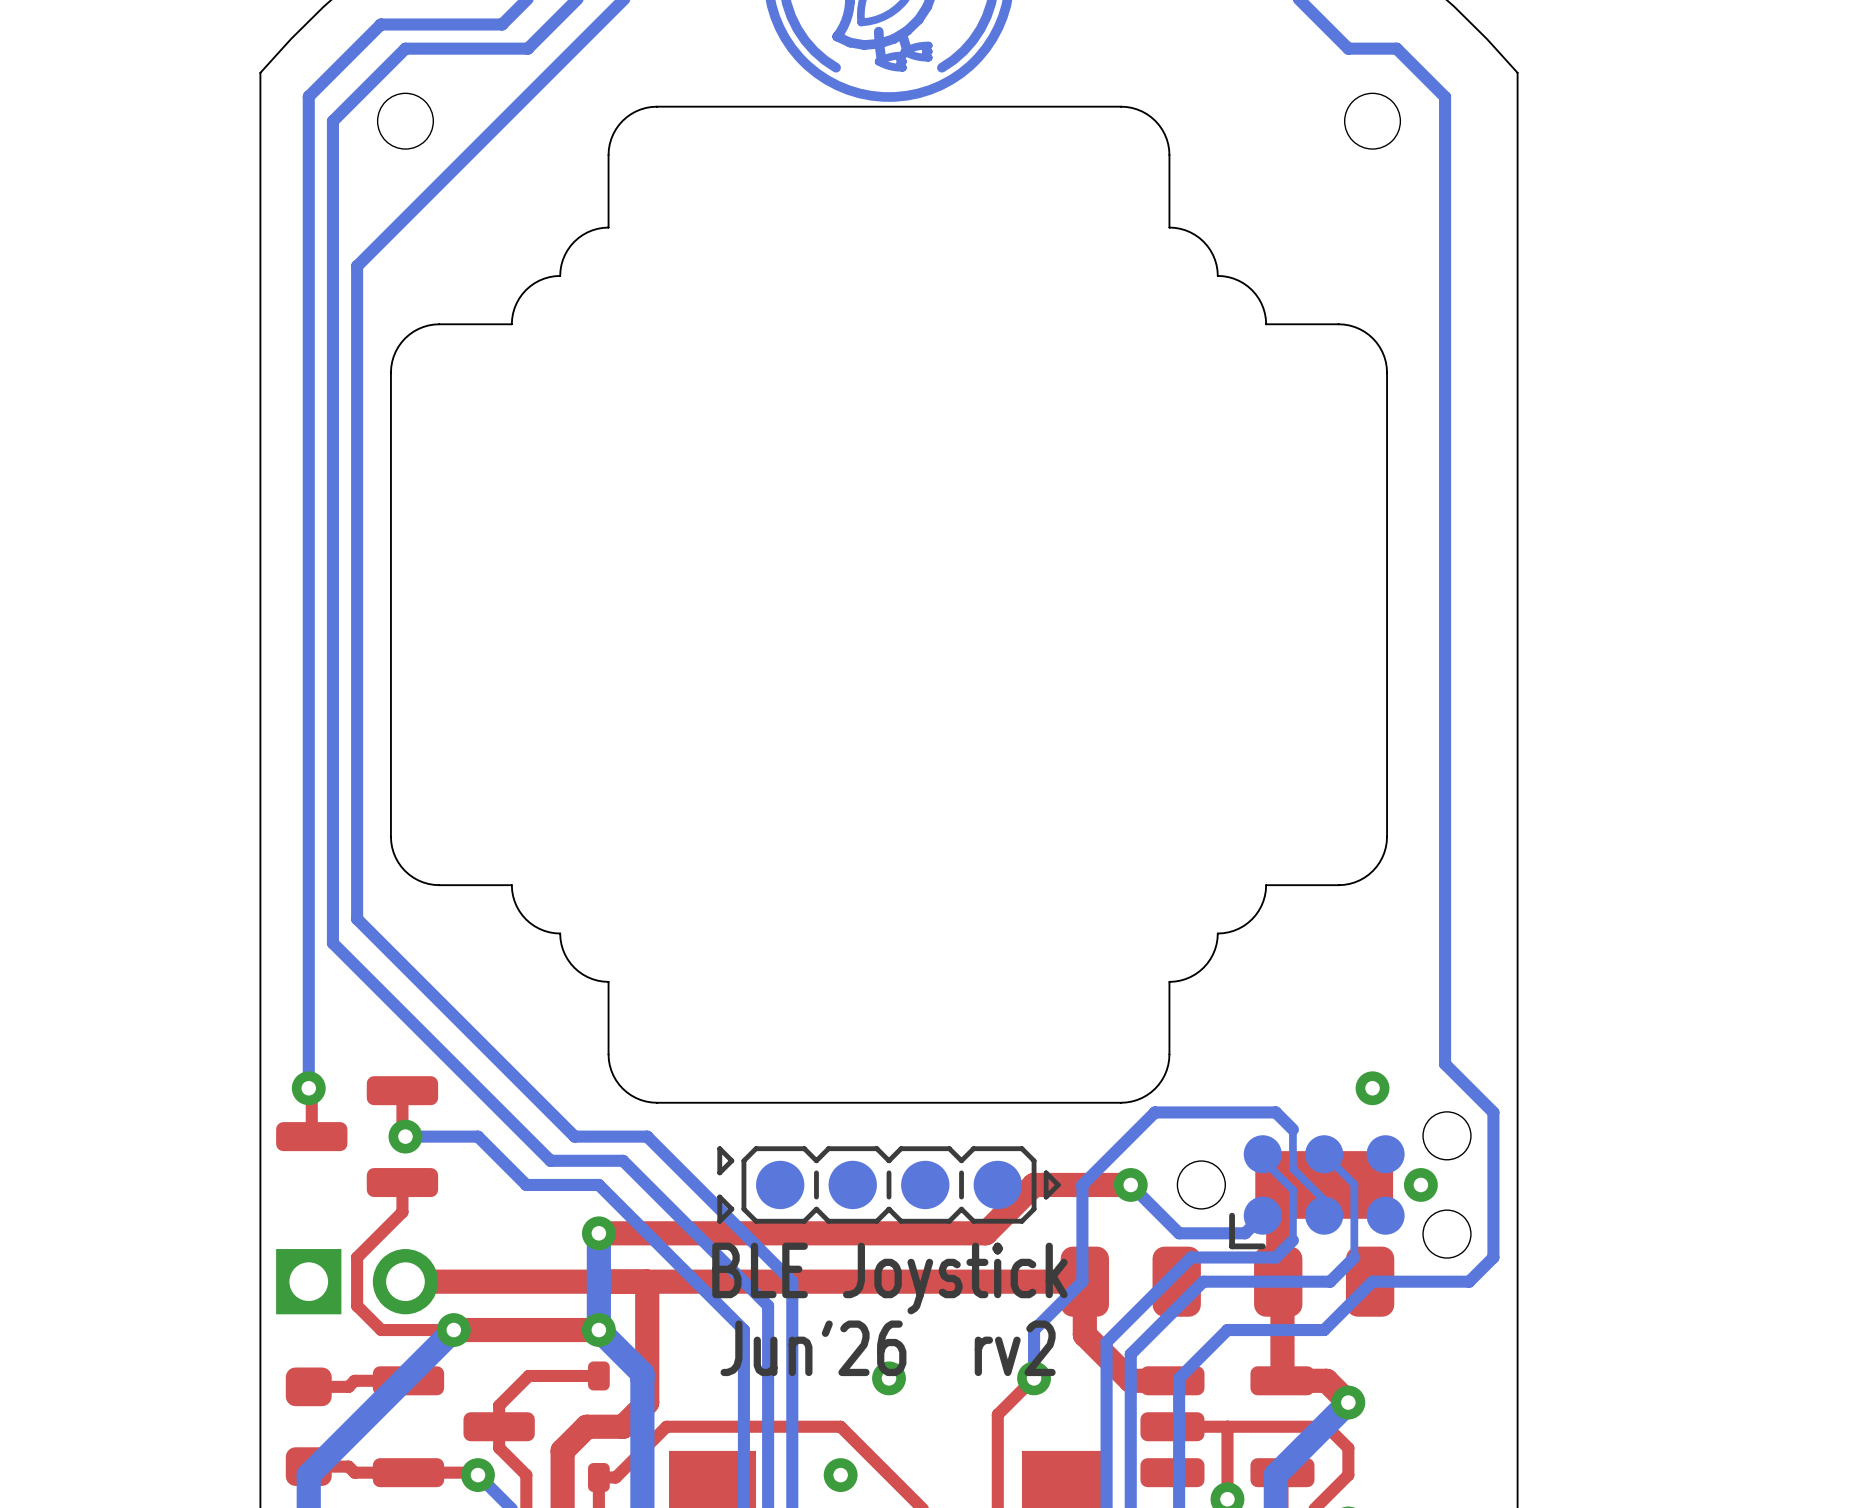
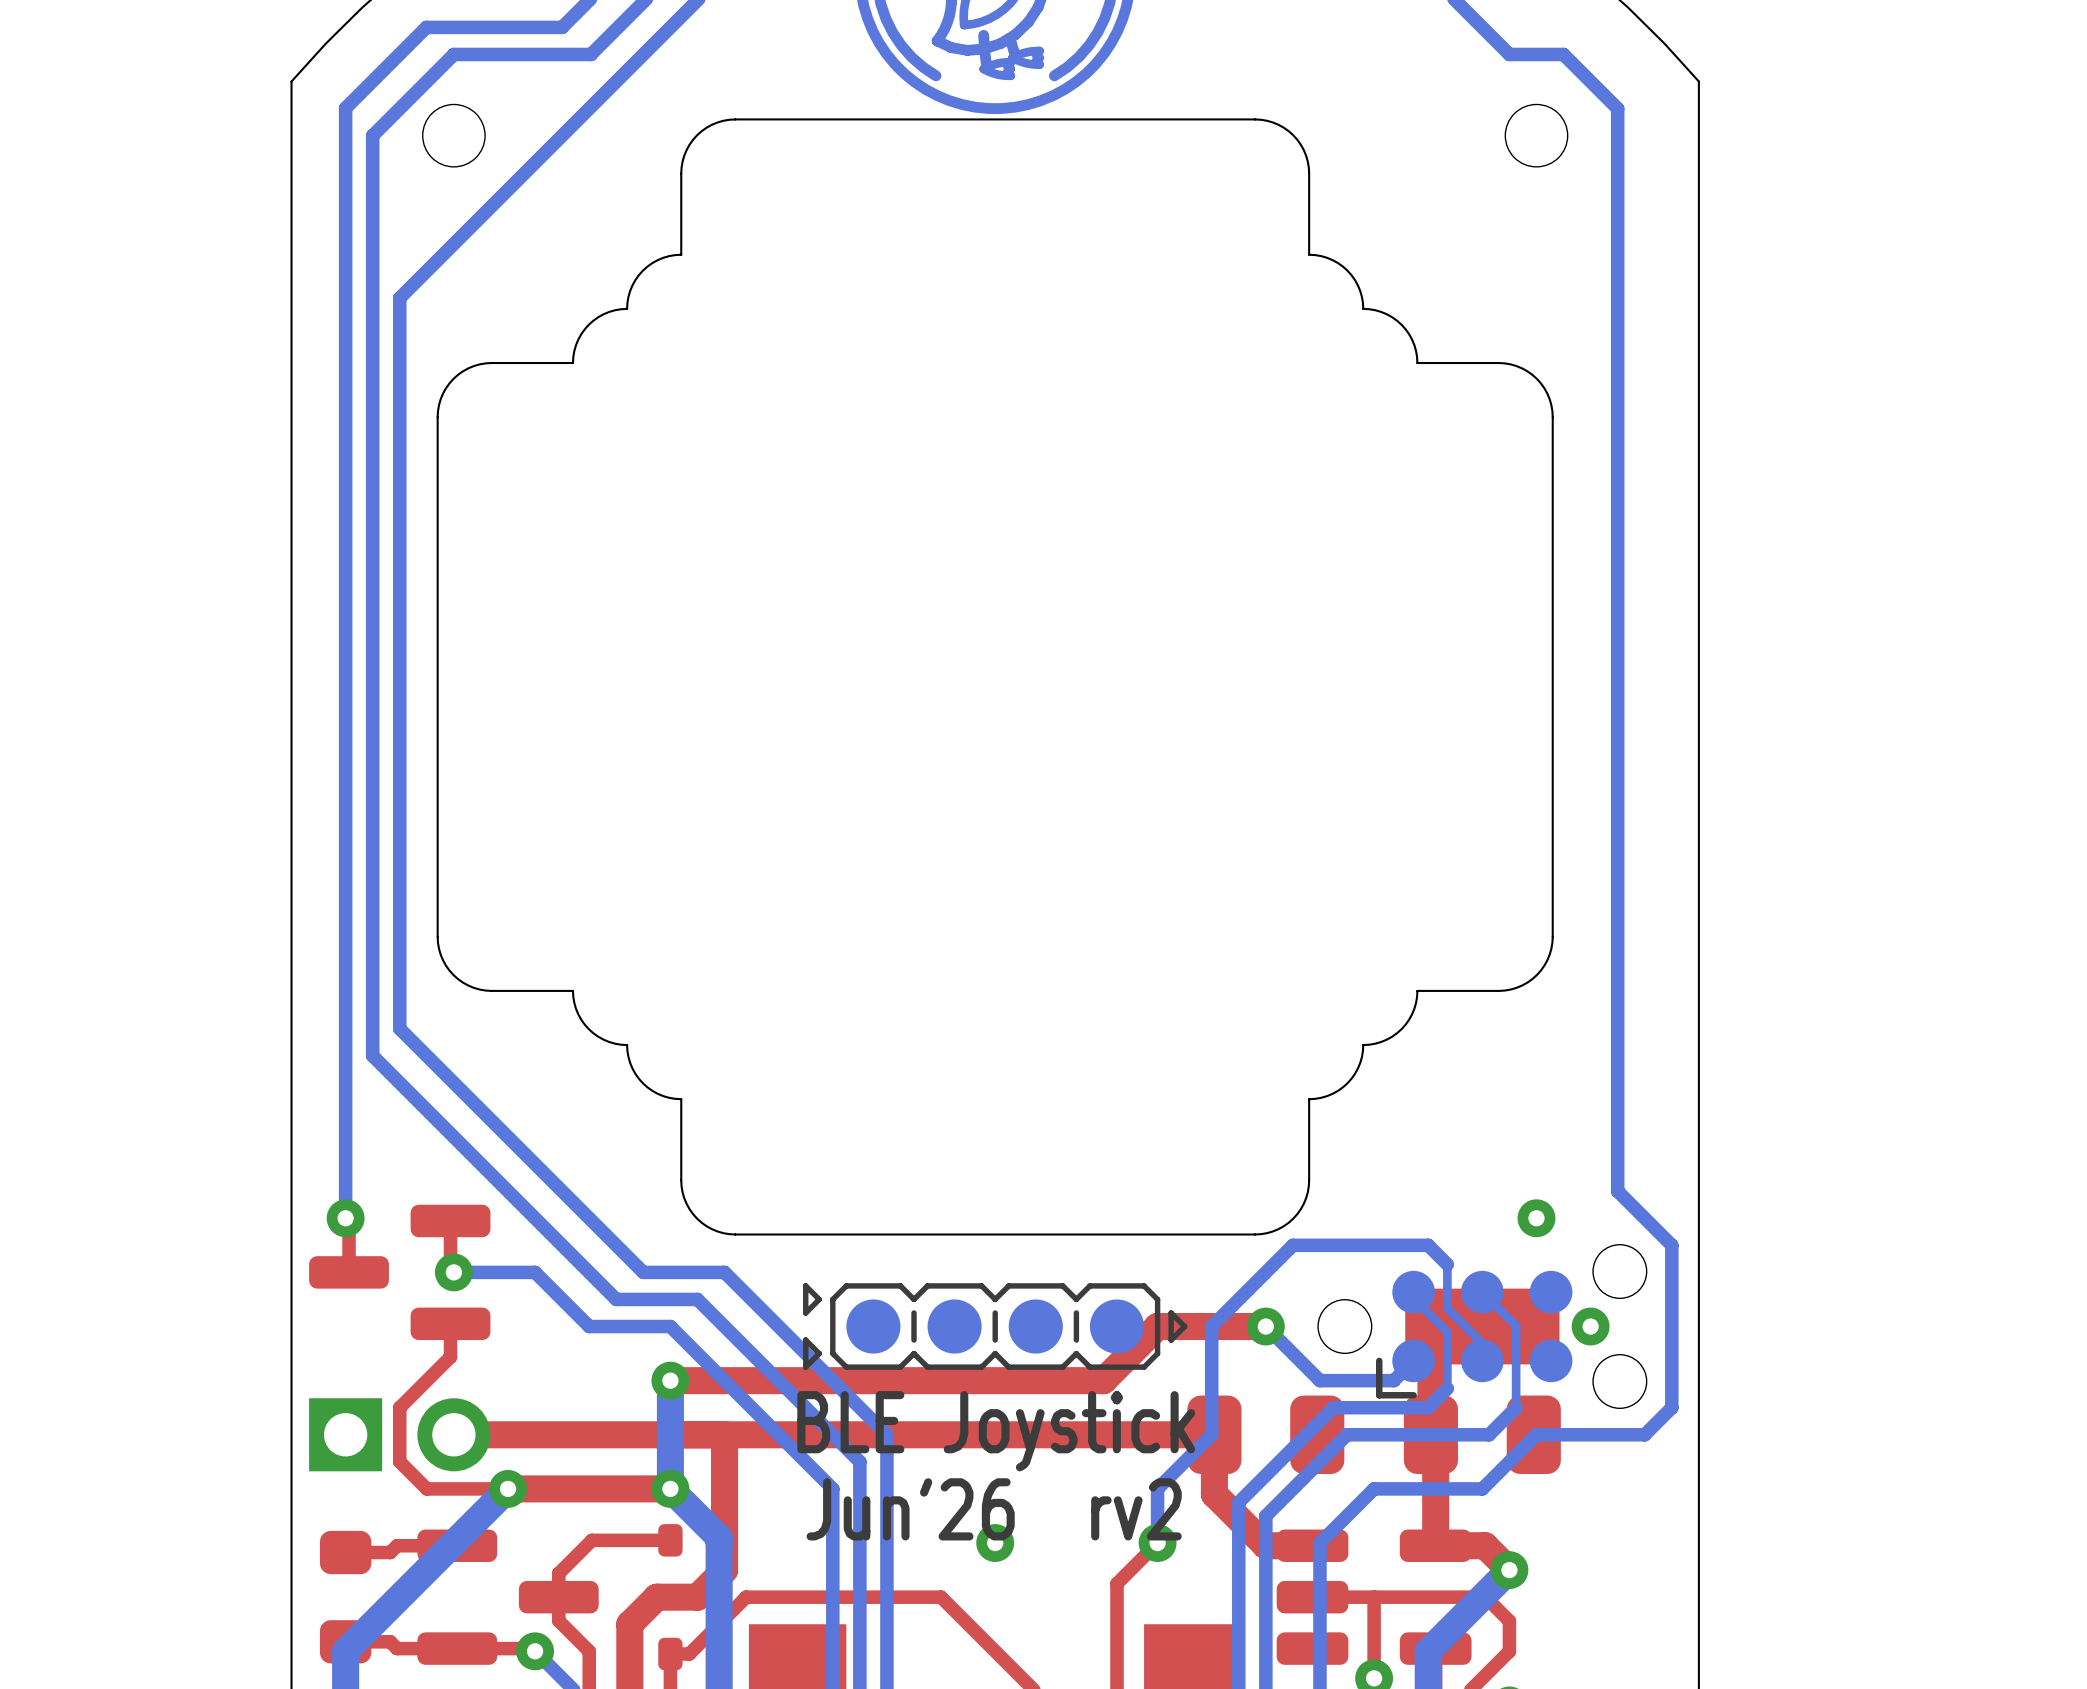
via: (840, 1475) -> none

